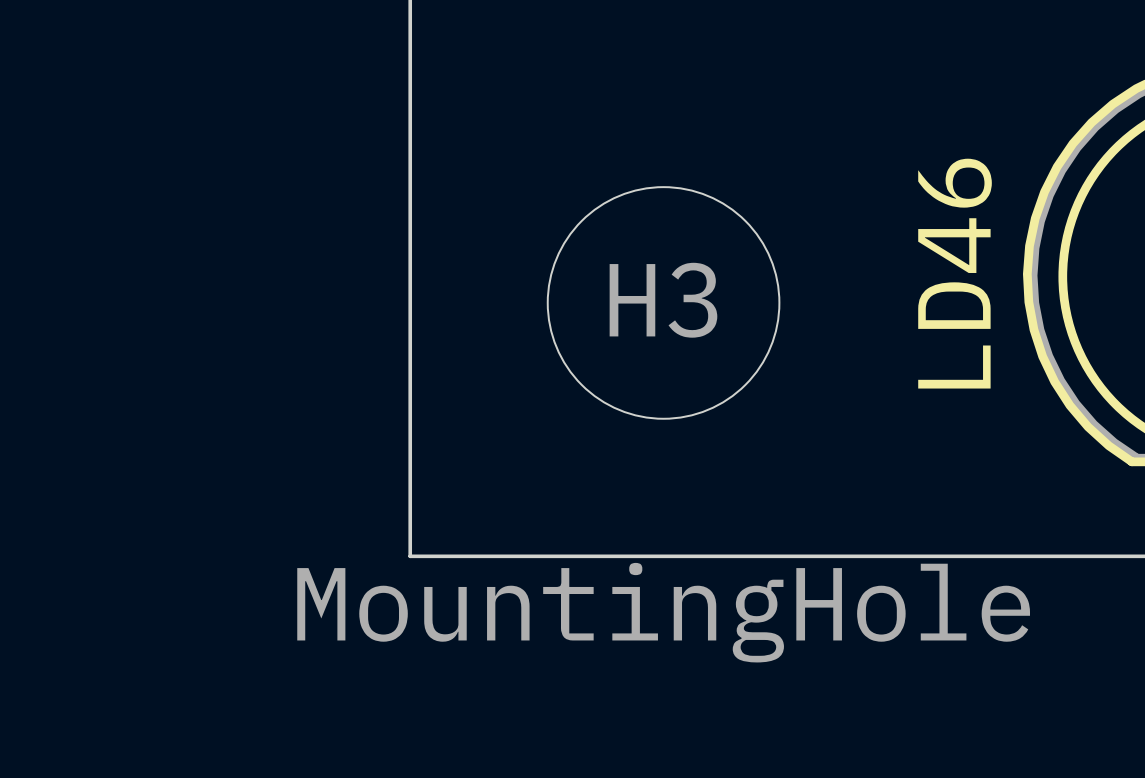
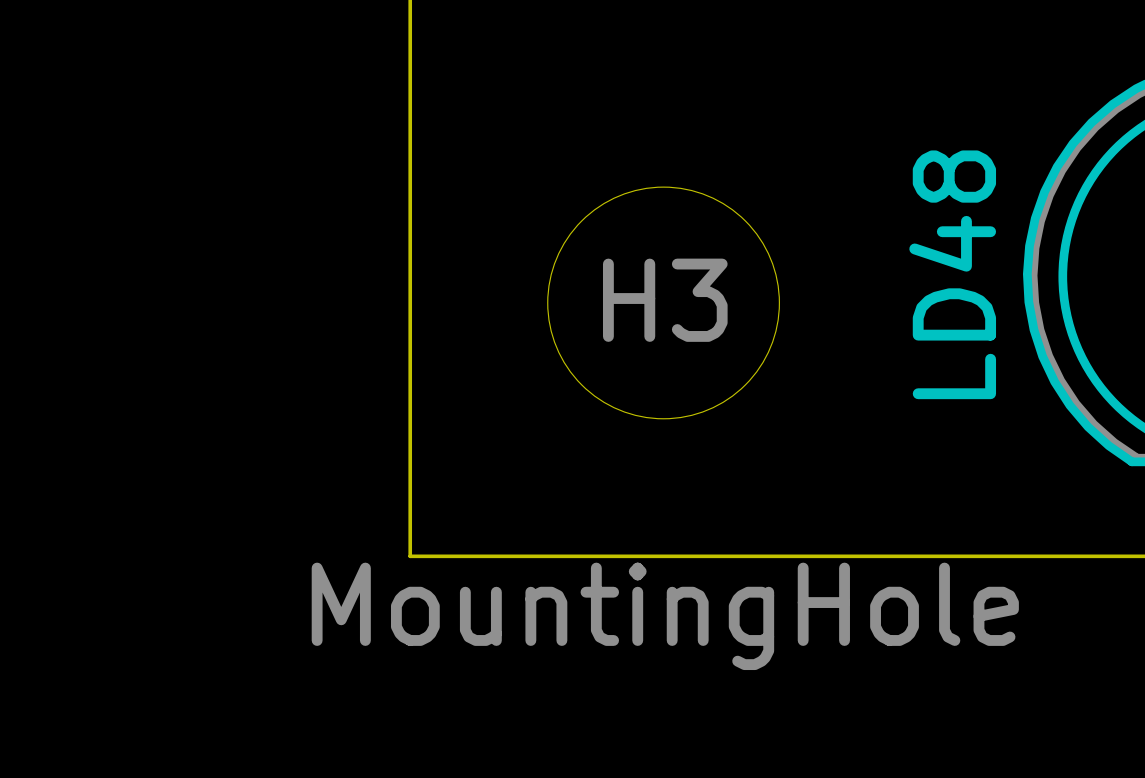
LD46 name: LD46 (955, 273) -> LD48 (952, 274)

